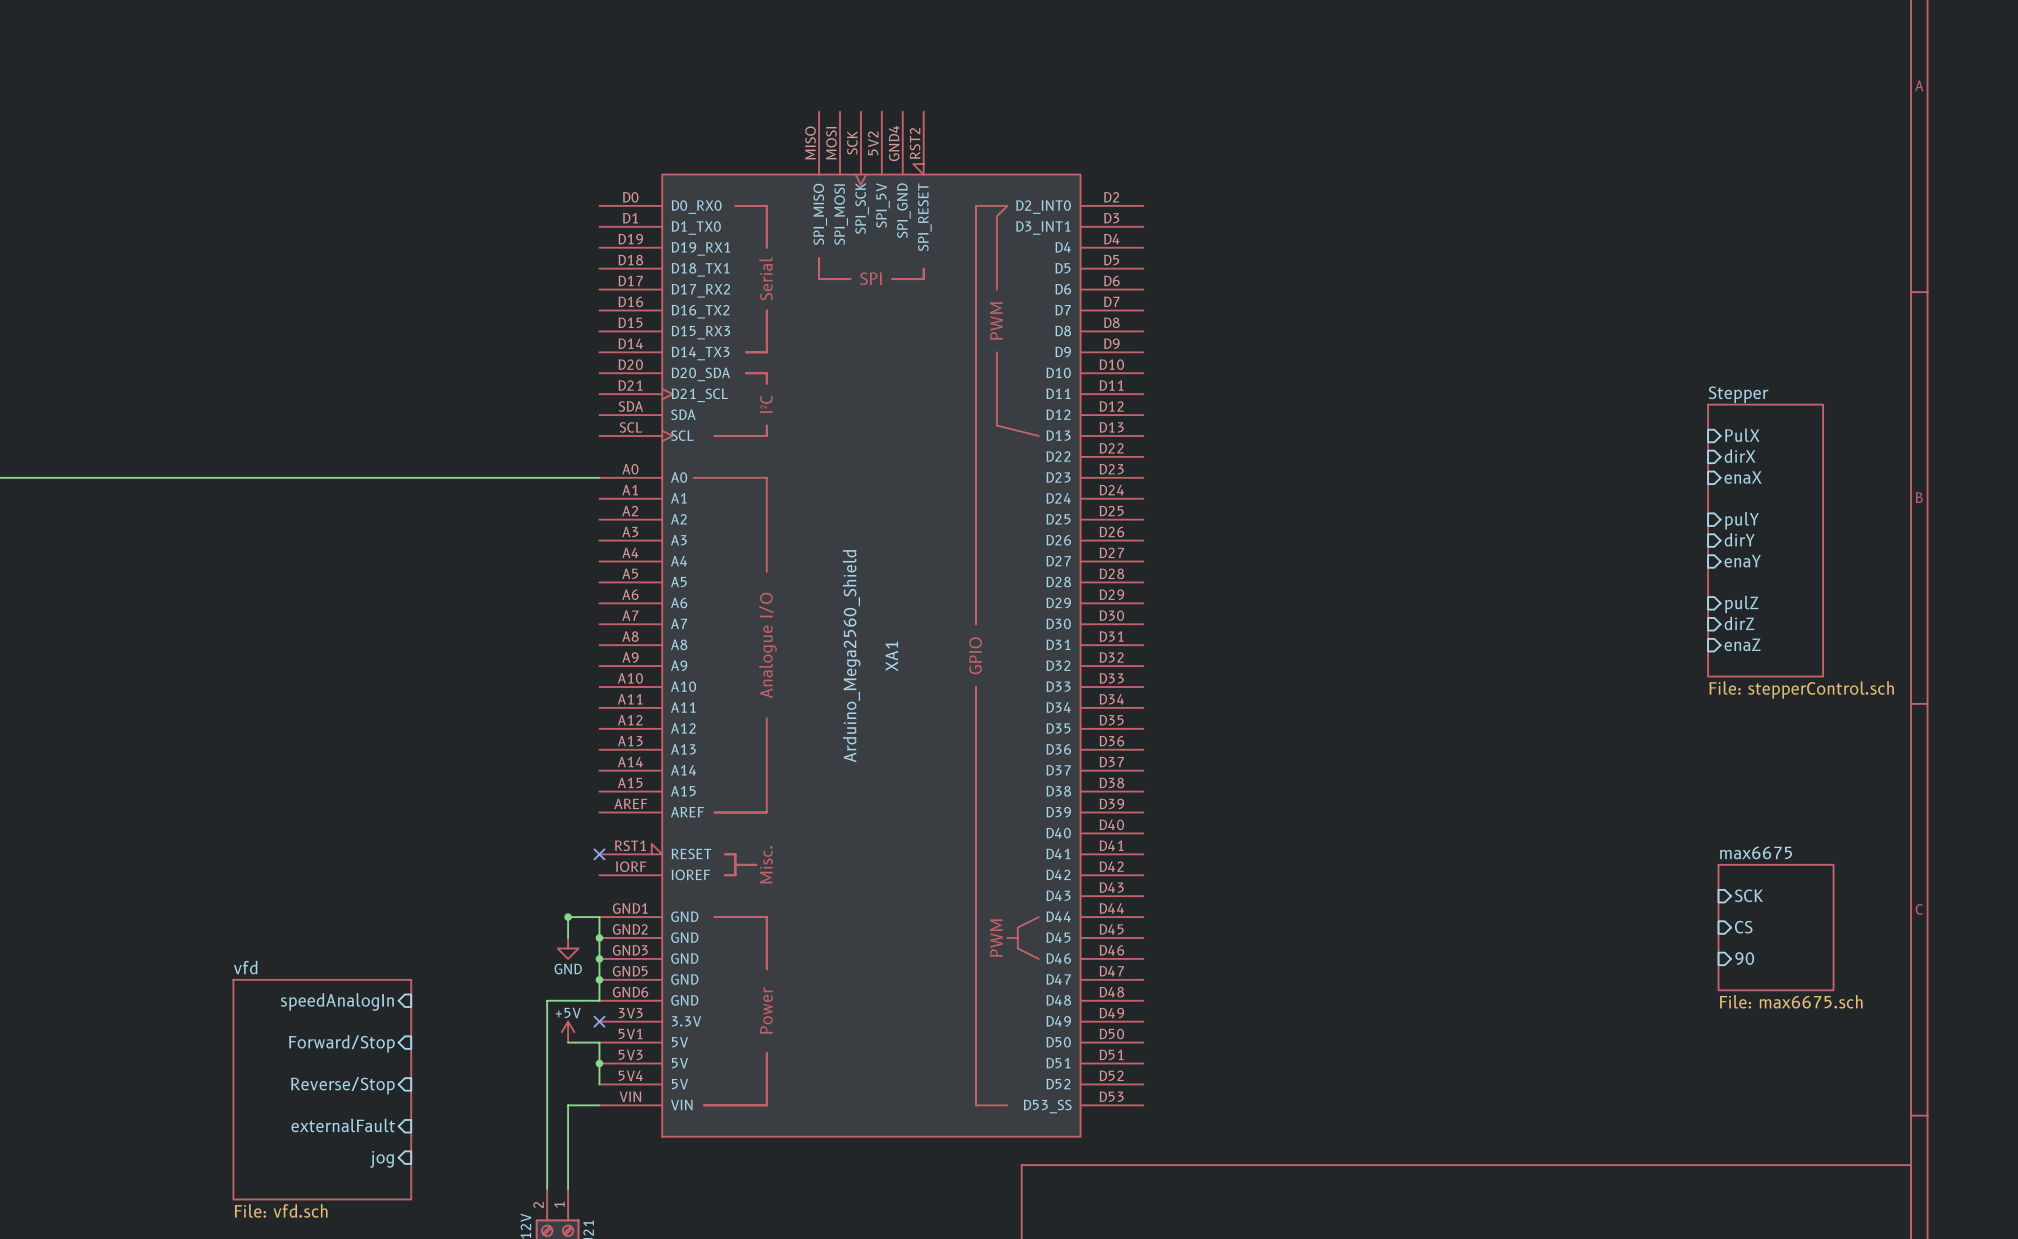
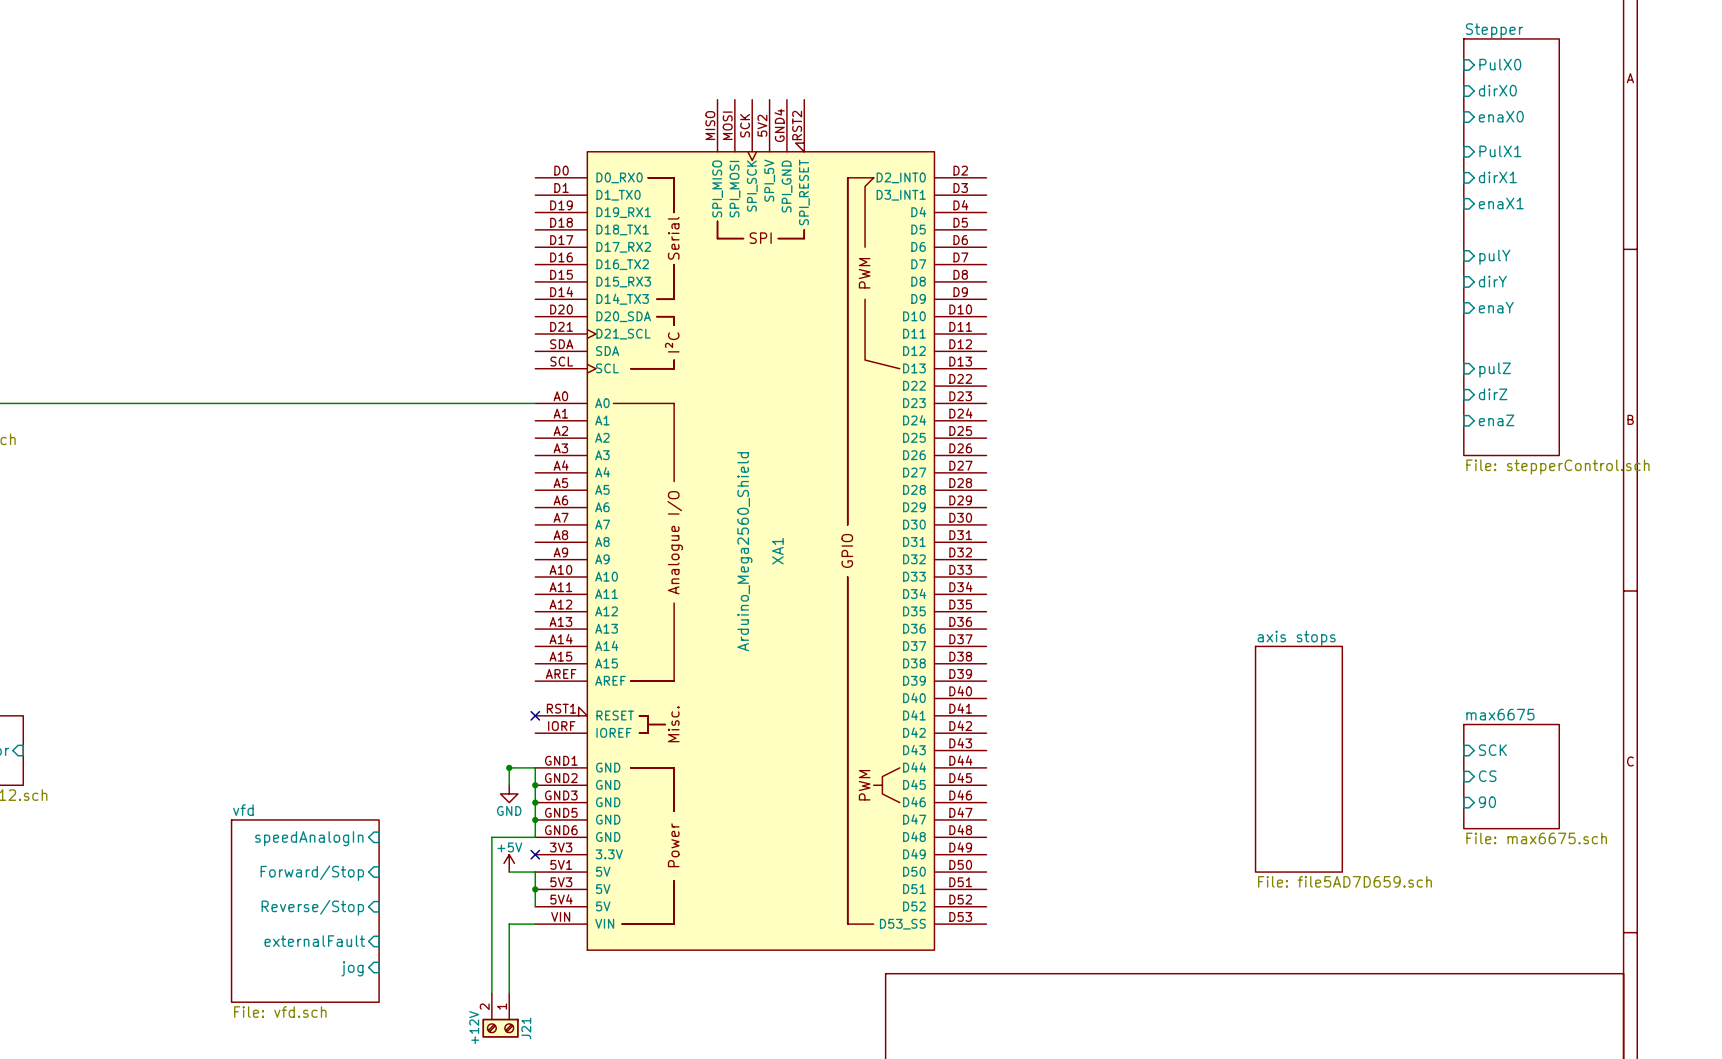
sheet pin: none -> PulX0 (1500, 64)
sheet pin: none -> dirX0 (1497, 90)
sheet pin: none -> enaX0 (1501, 116)
sheet pin: none -> PulX1 (1500, 151)
sheet pin: none -> dirX1 (1497, 177)
sheet pin: none -> enaX1 (1501, 203)
sheet Stepper: none -> File: stepperControl.sch (1511, 247)
sheet pin: none -> pulY (1494, 257)
sheet pin: none -> dirY (1492, 281)
sheet pin: PulX (1742, 435) -> none
sheet pin: dirX (1740, 456) -> none
sheet pin: enaX (1743, 477) -> none
sheet pin: pulY (1742, 520) -> none
sheet pin: dirY (1739, 539) -> none
sheet Stepper: File: stepperControl.sch (1765, 540) -> none
sheet pin position: enaY (1742, 561) -> enaY (1496, 307)
sheet pin position: pulZ (1741, 604) -> pulZ (1495, 370)
sheet pin position: dirZ (1739, 623) -> dirZ (1493, 394)
sheet pin position: enaZ (1742, 644) -> enaZ (1496, 420)
sheet axis stops: none -> File: file5AD7D659.sch (1298, 759)

